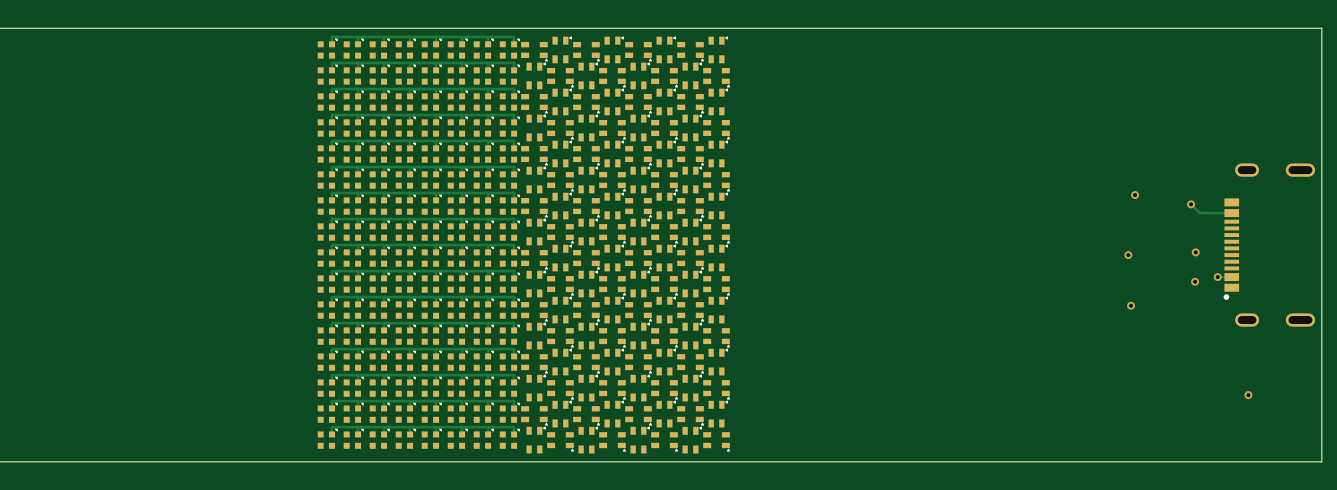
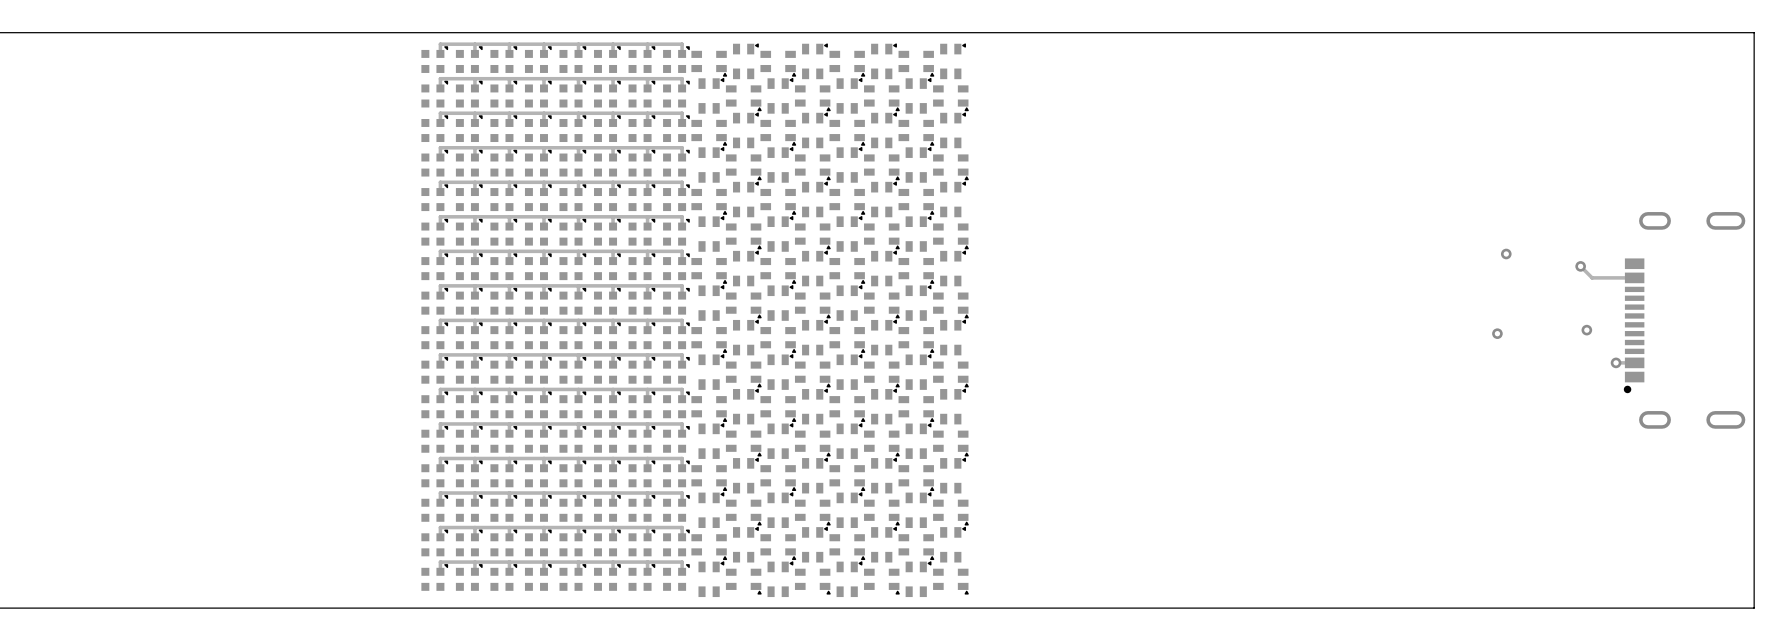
via: (1195, 281) -> none
via: (1131, 305) -> none
via: (1248, 395) -> none

